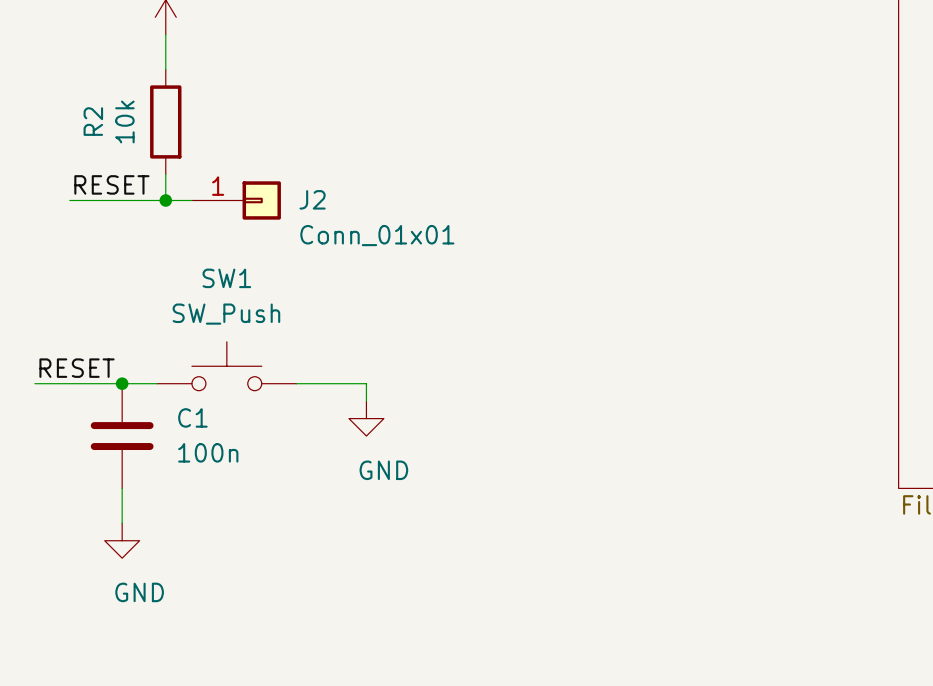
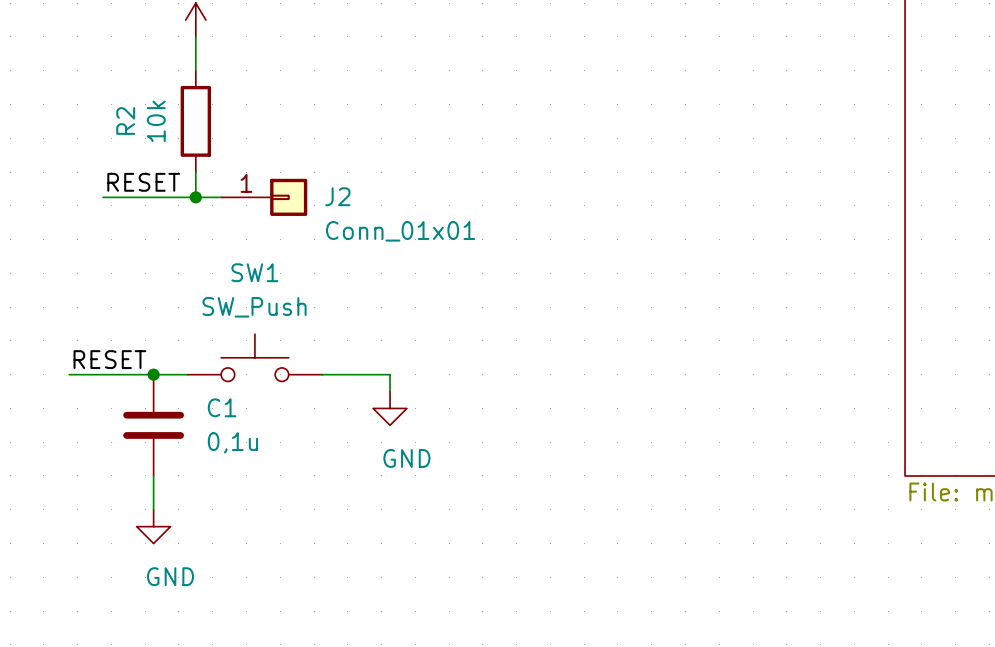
C1 value: 100n (208, 452) -> 0,1u (232, 442)

